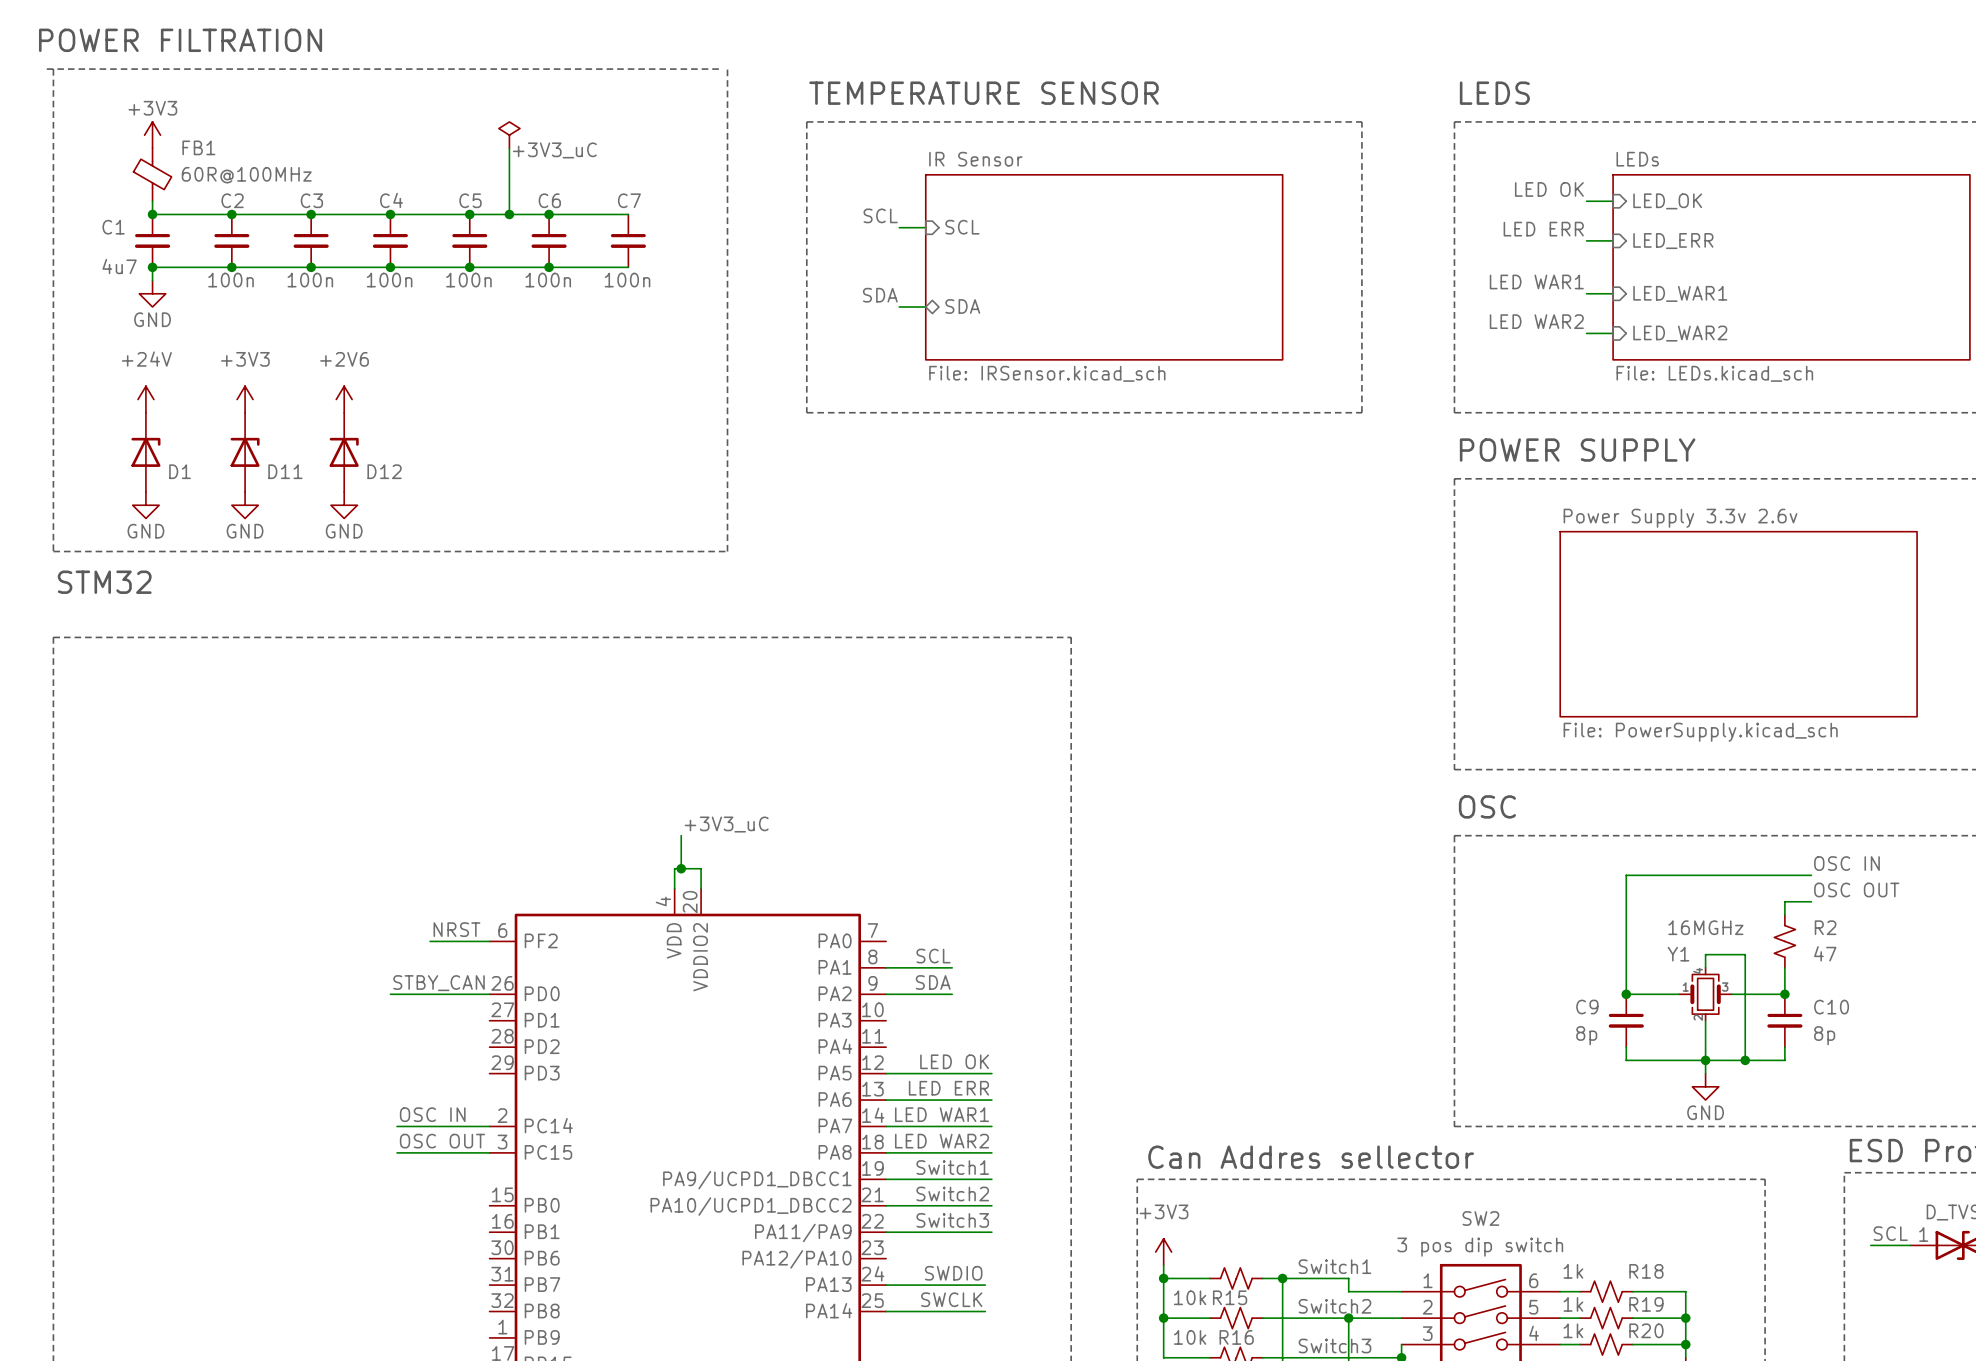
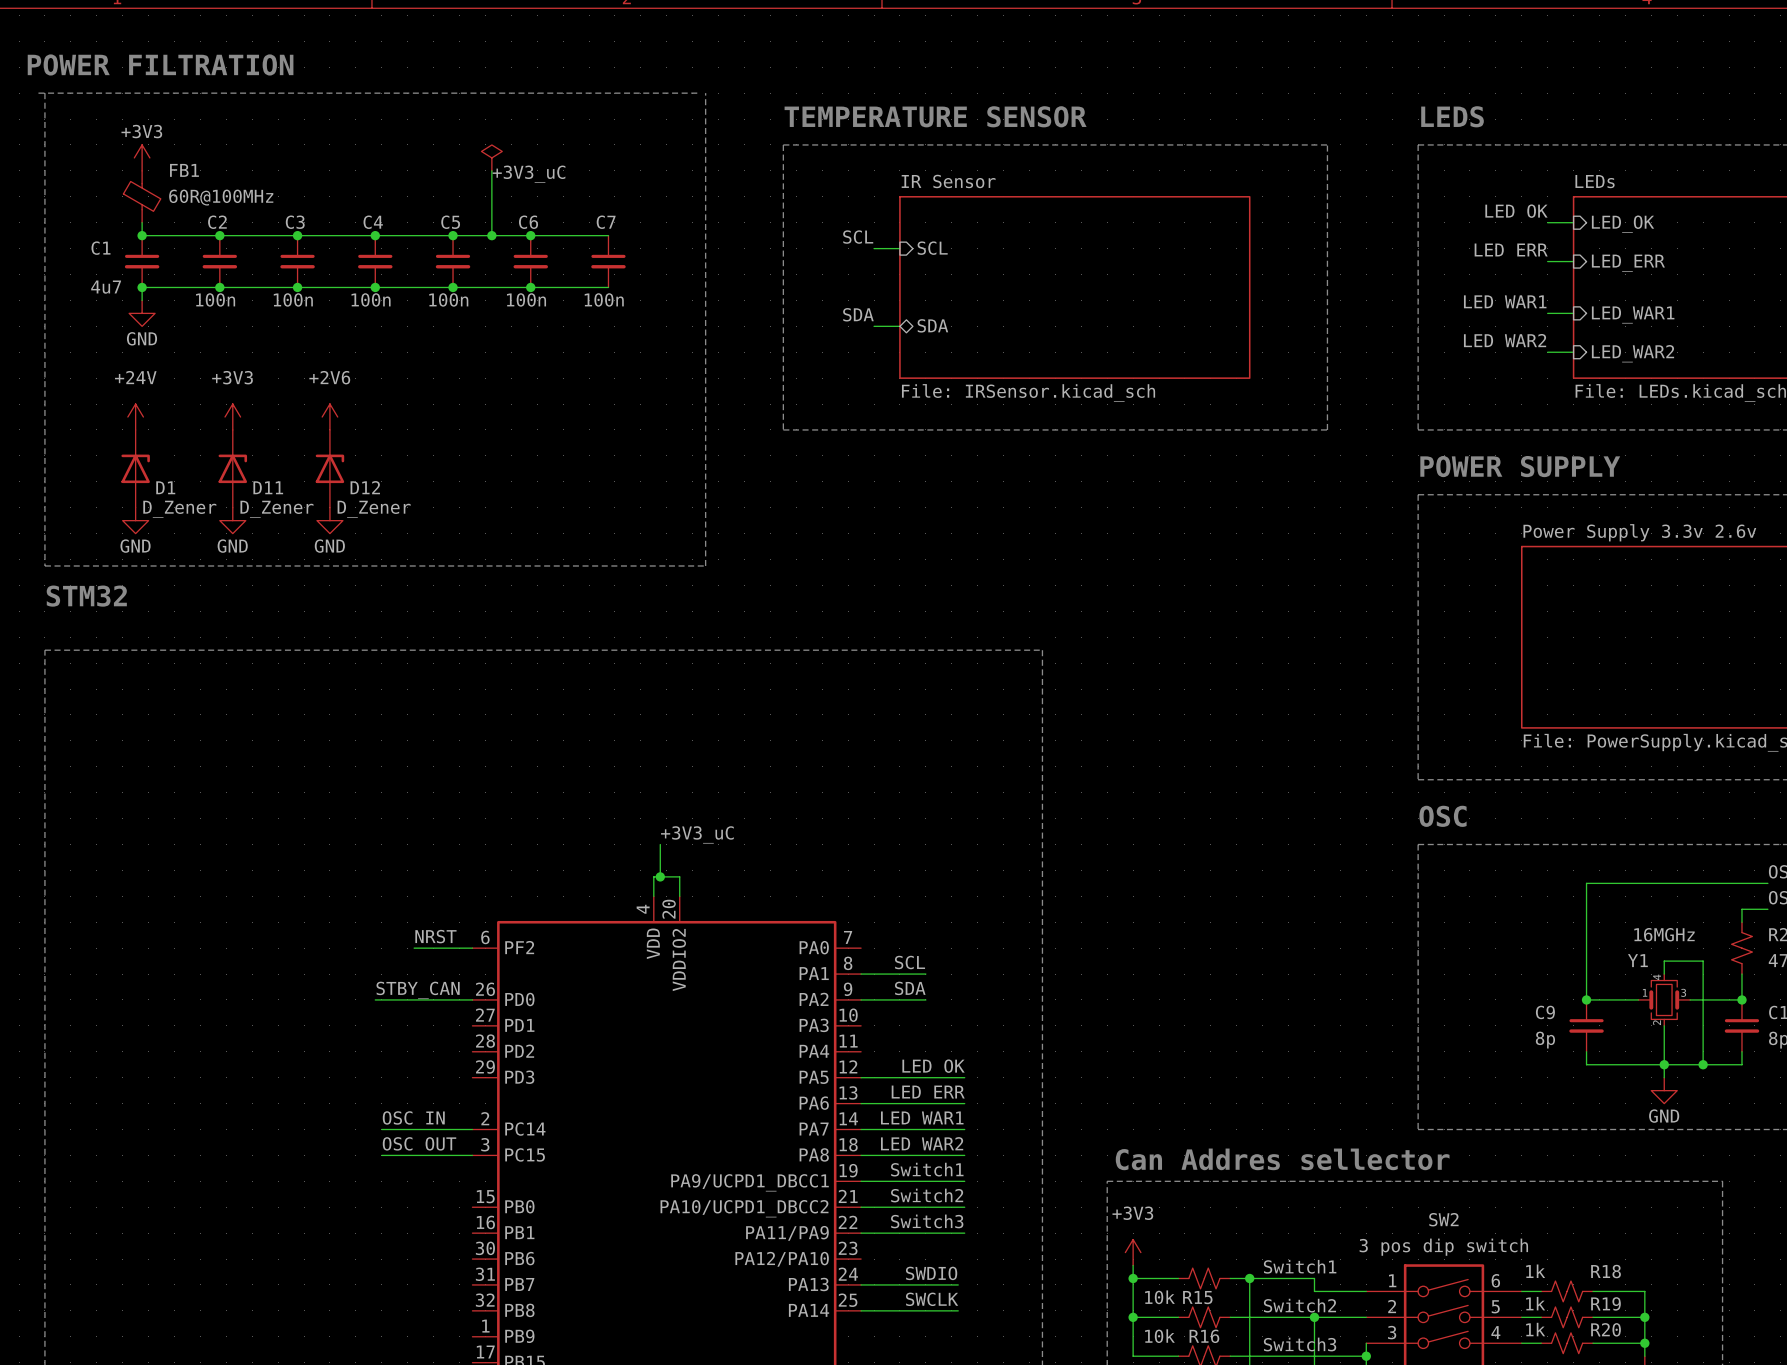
D1 value: none -> D_Zener (179, 509)
D11 value: none -> D_Zener (276, 509)
D12 value: none -> D_Zener (374, 509)

